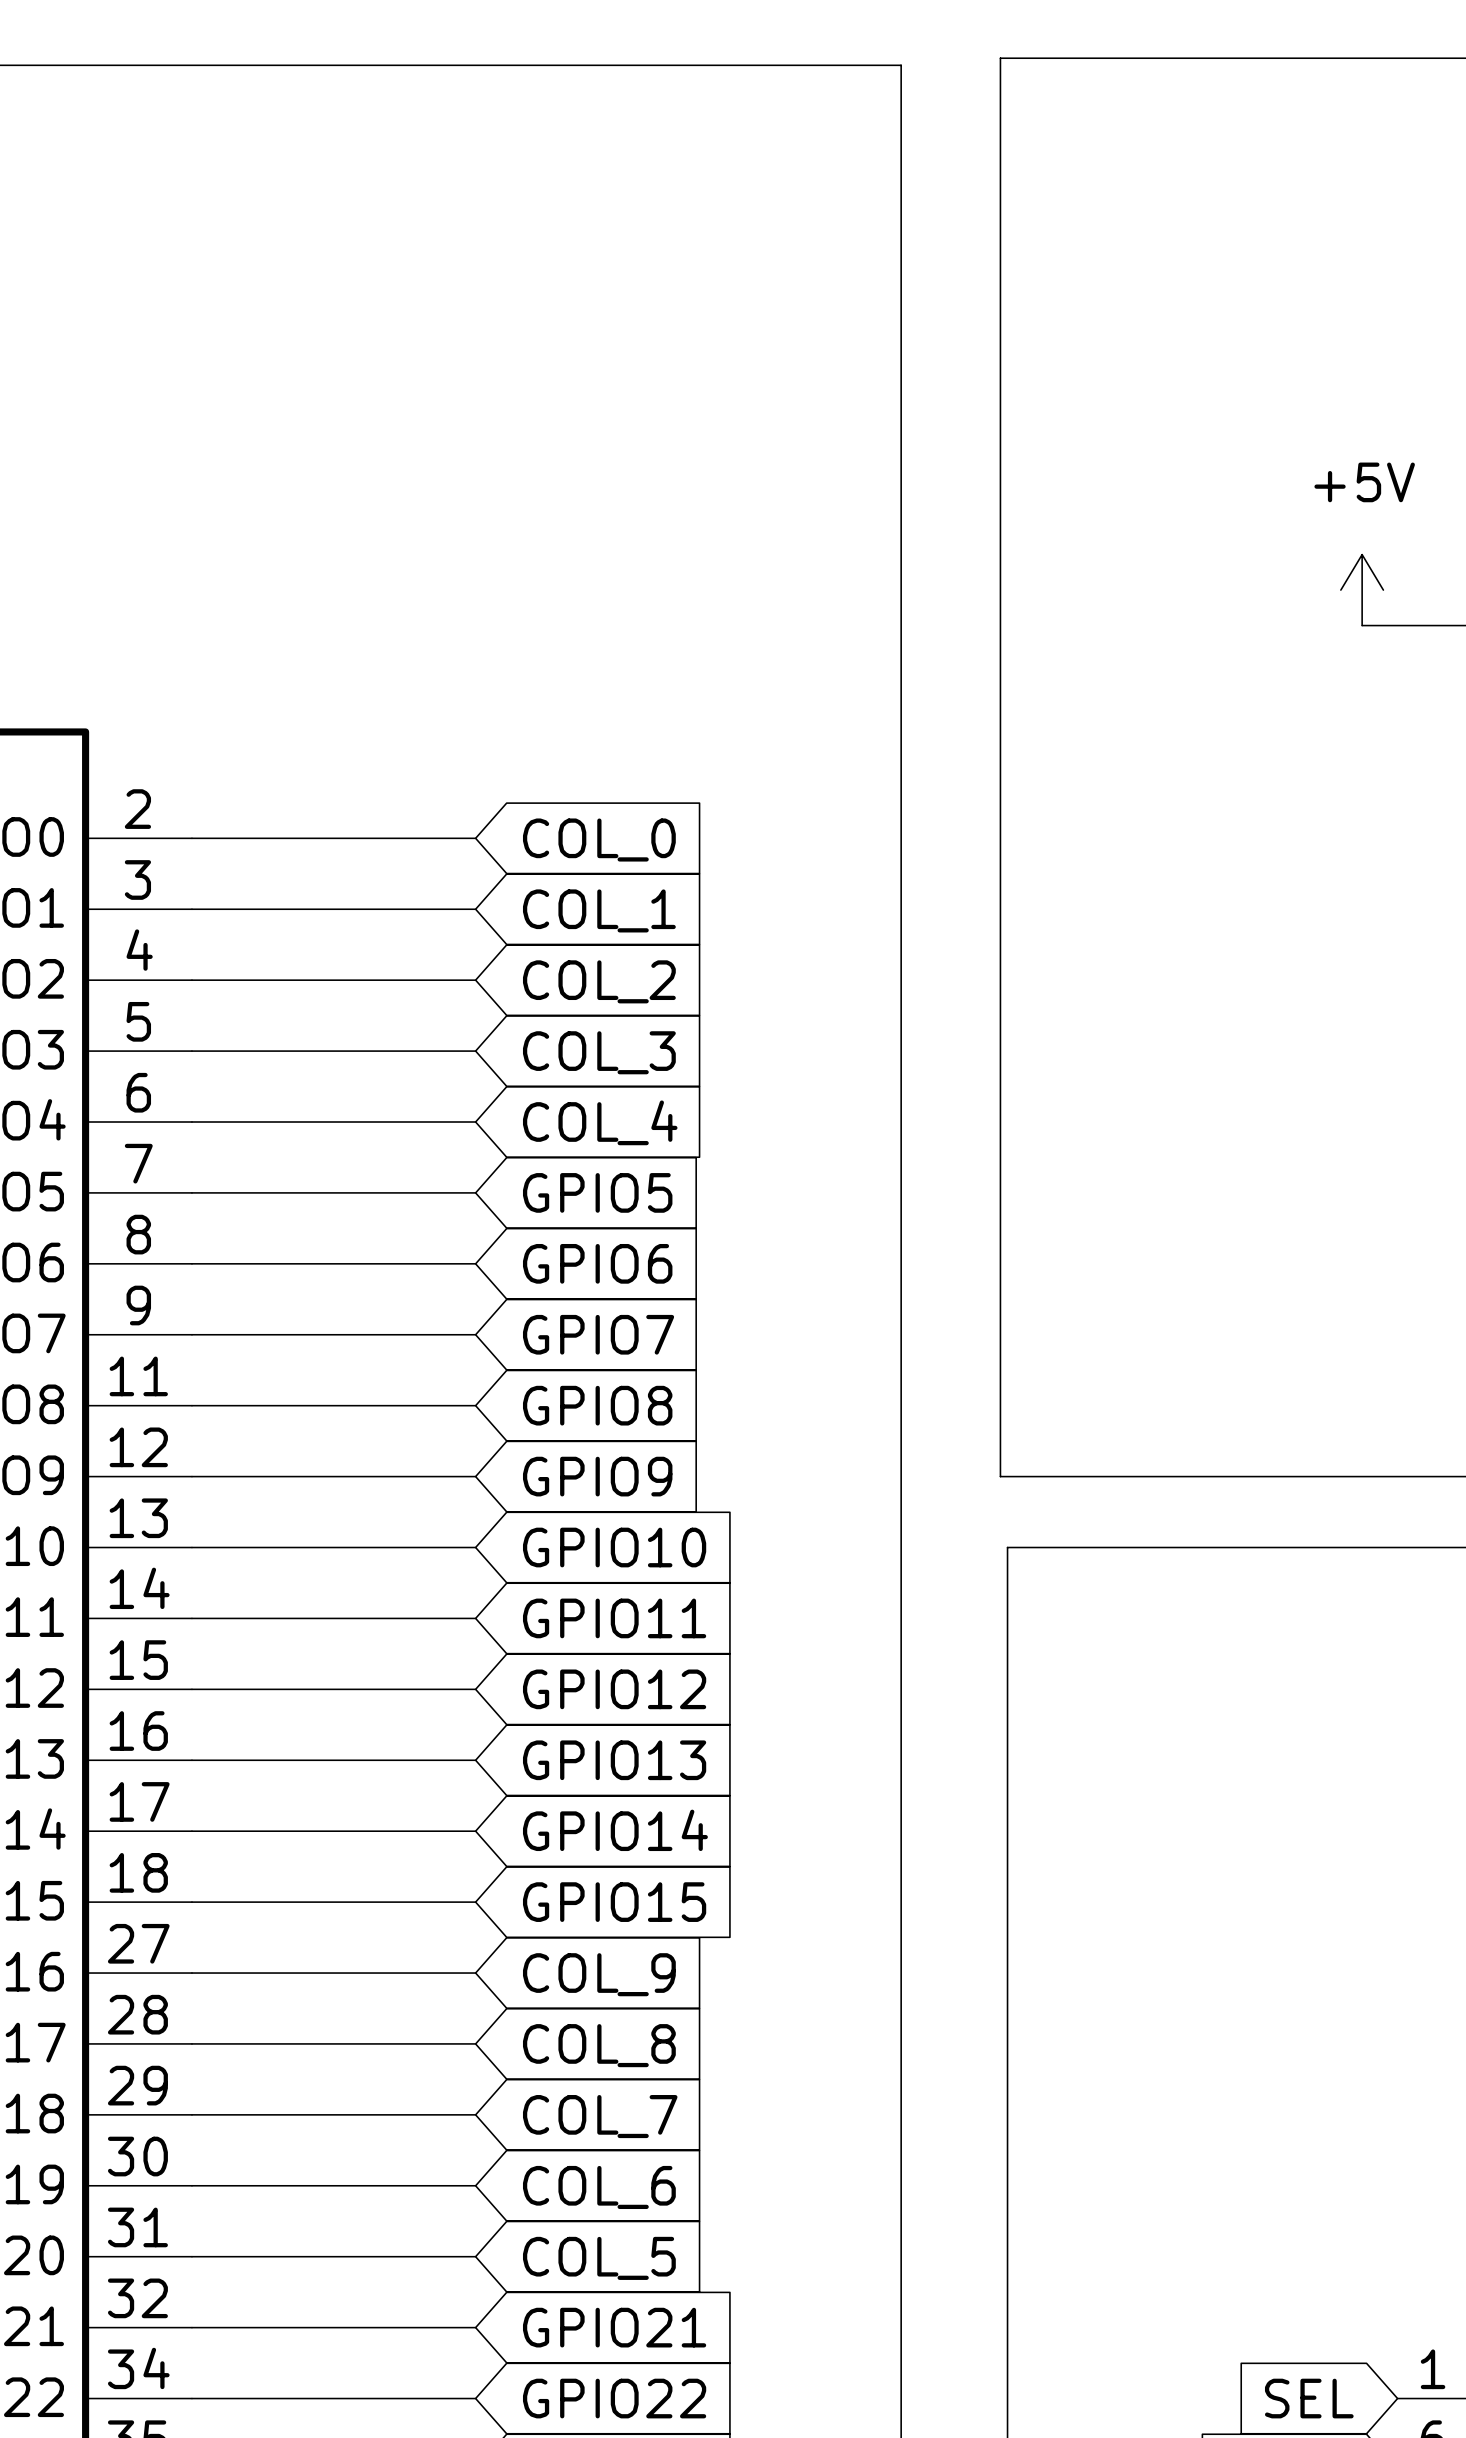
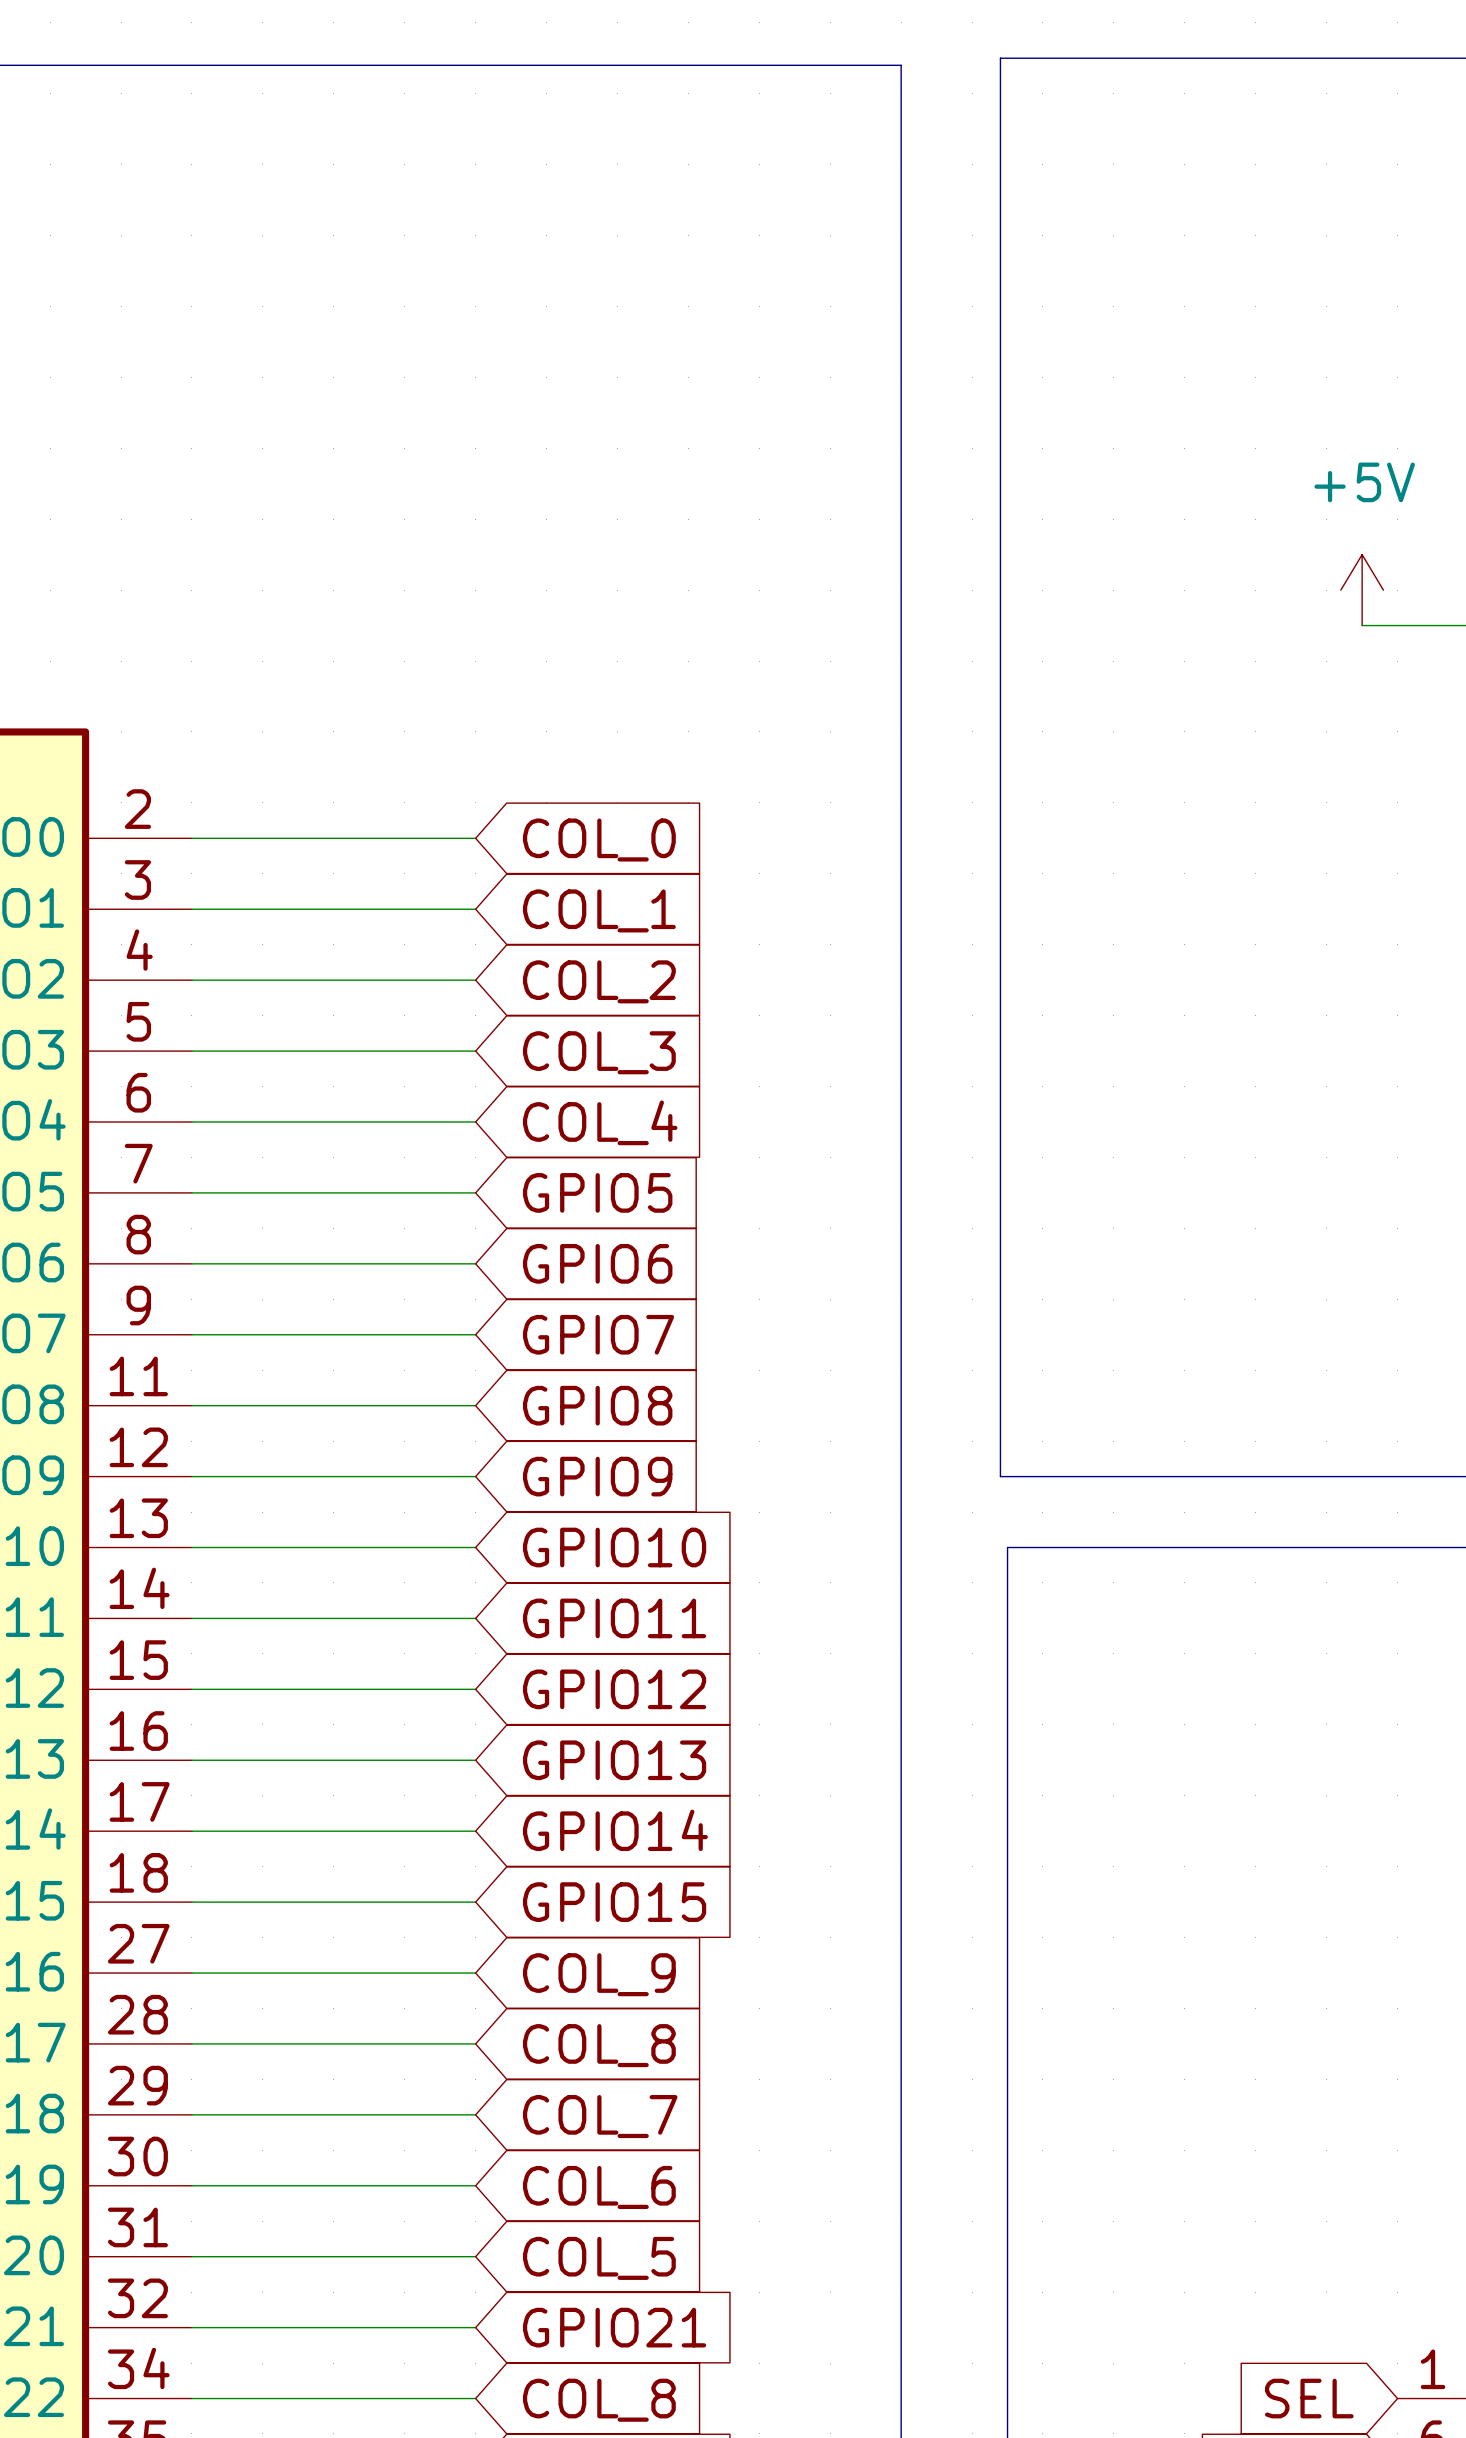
global label: GPIO22 (614, 2398) -> COL_8 (599, 2400)

